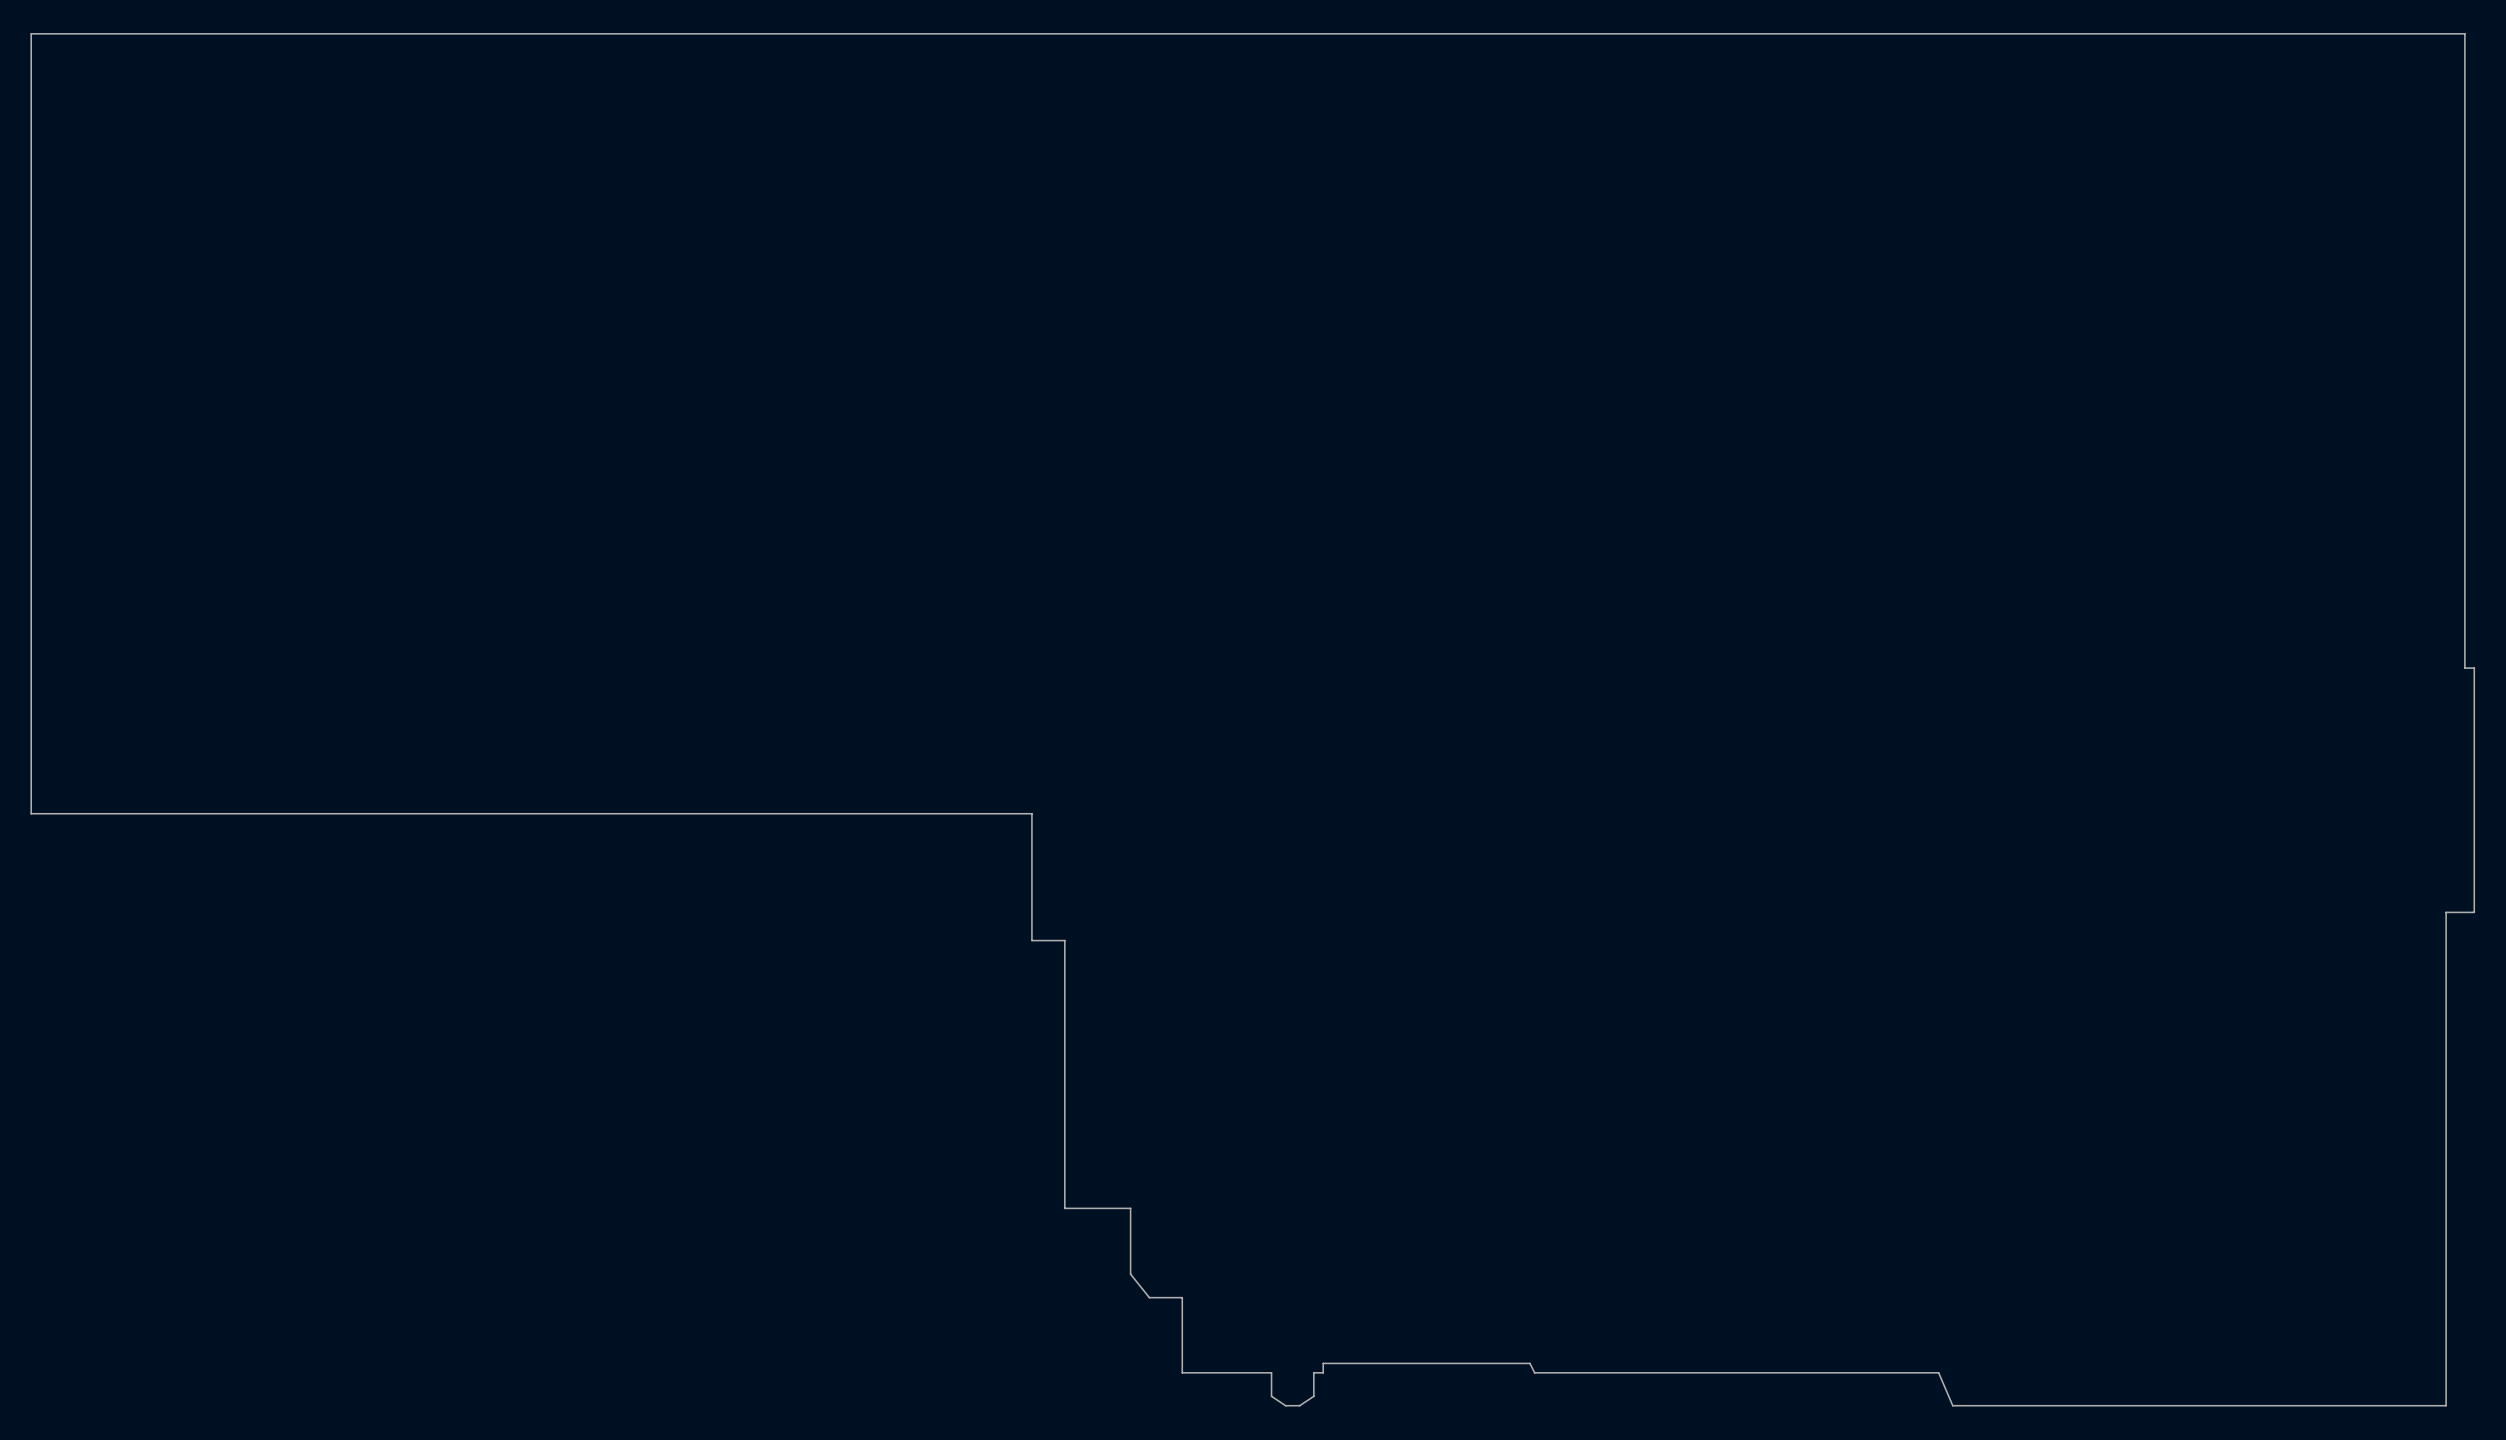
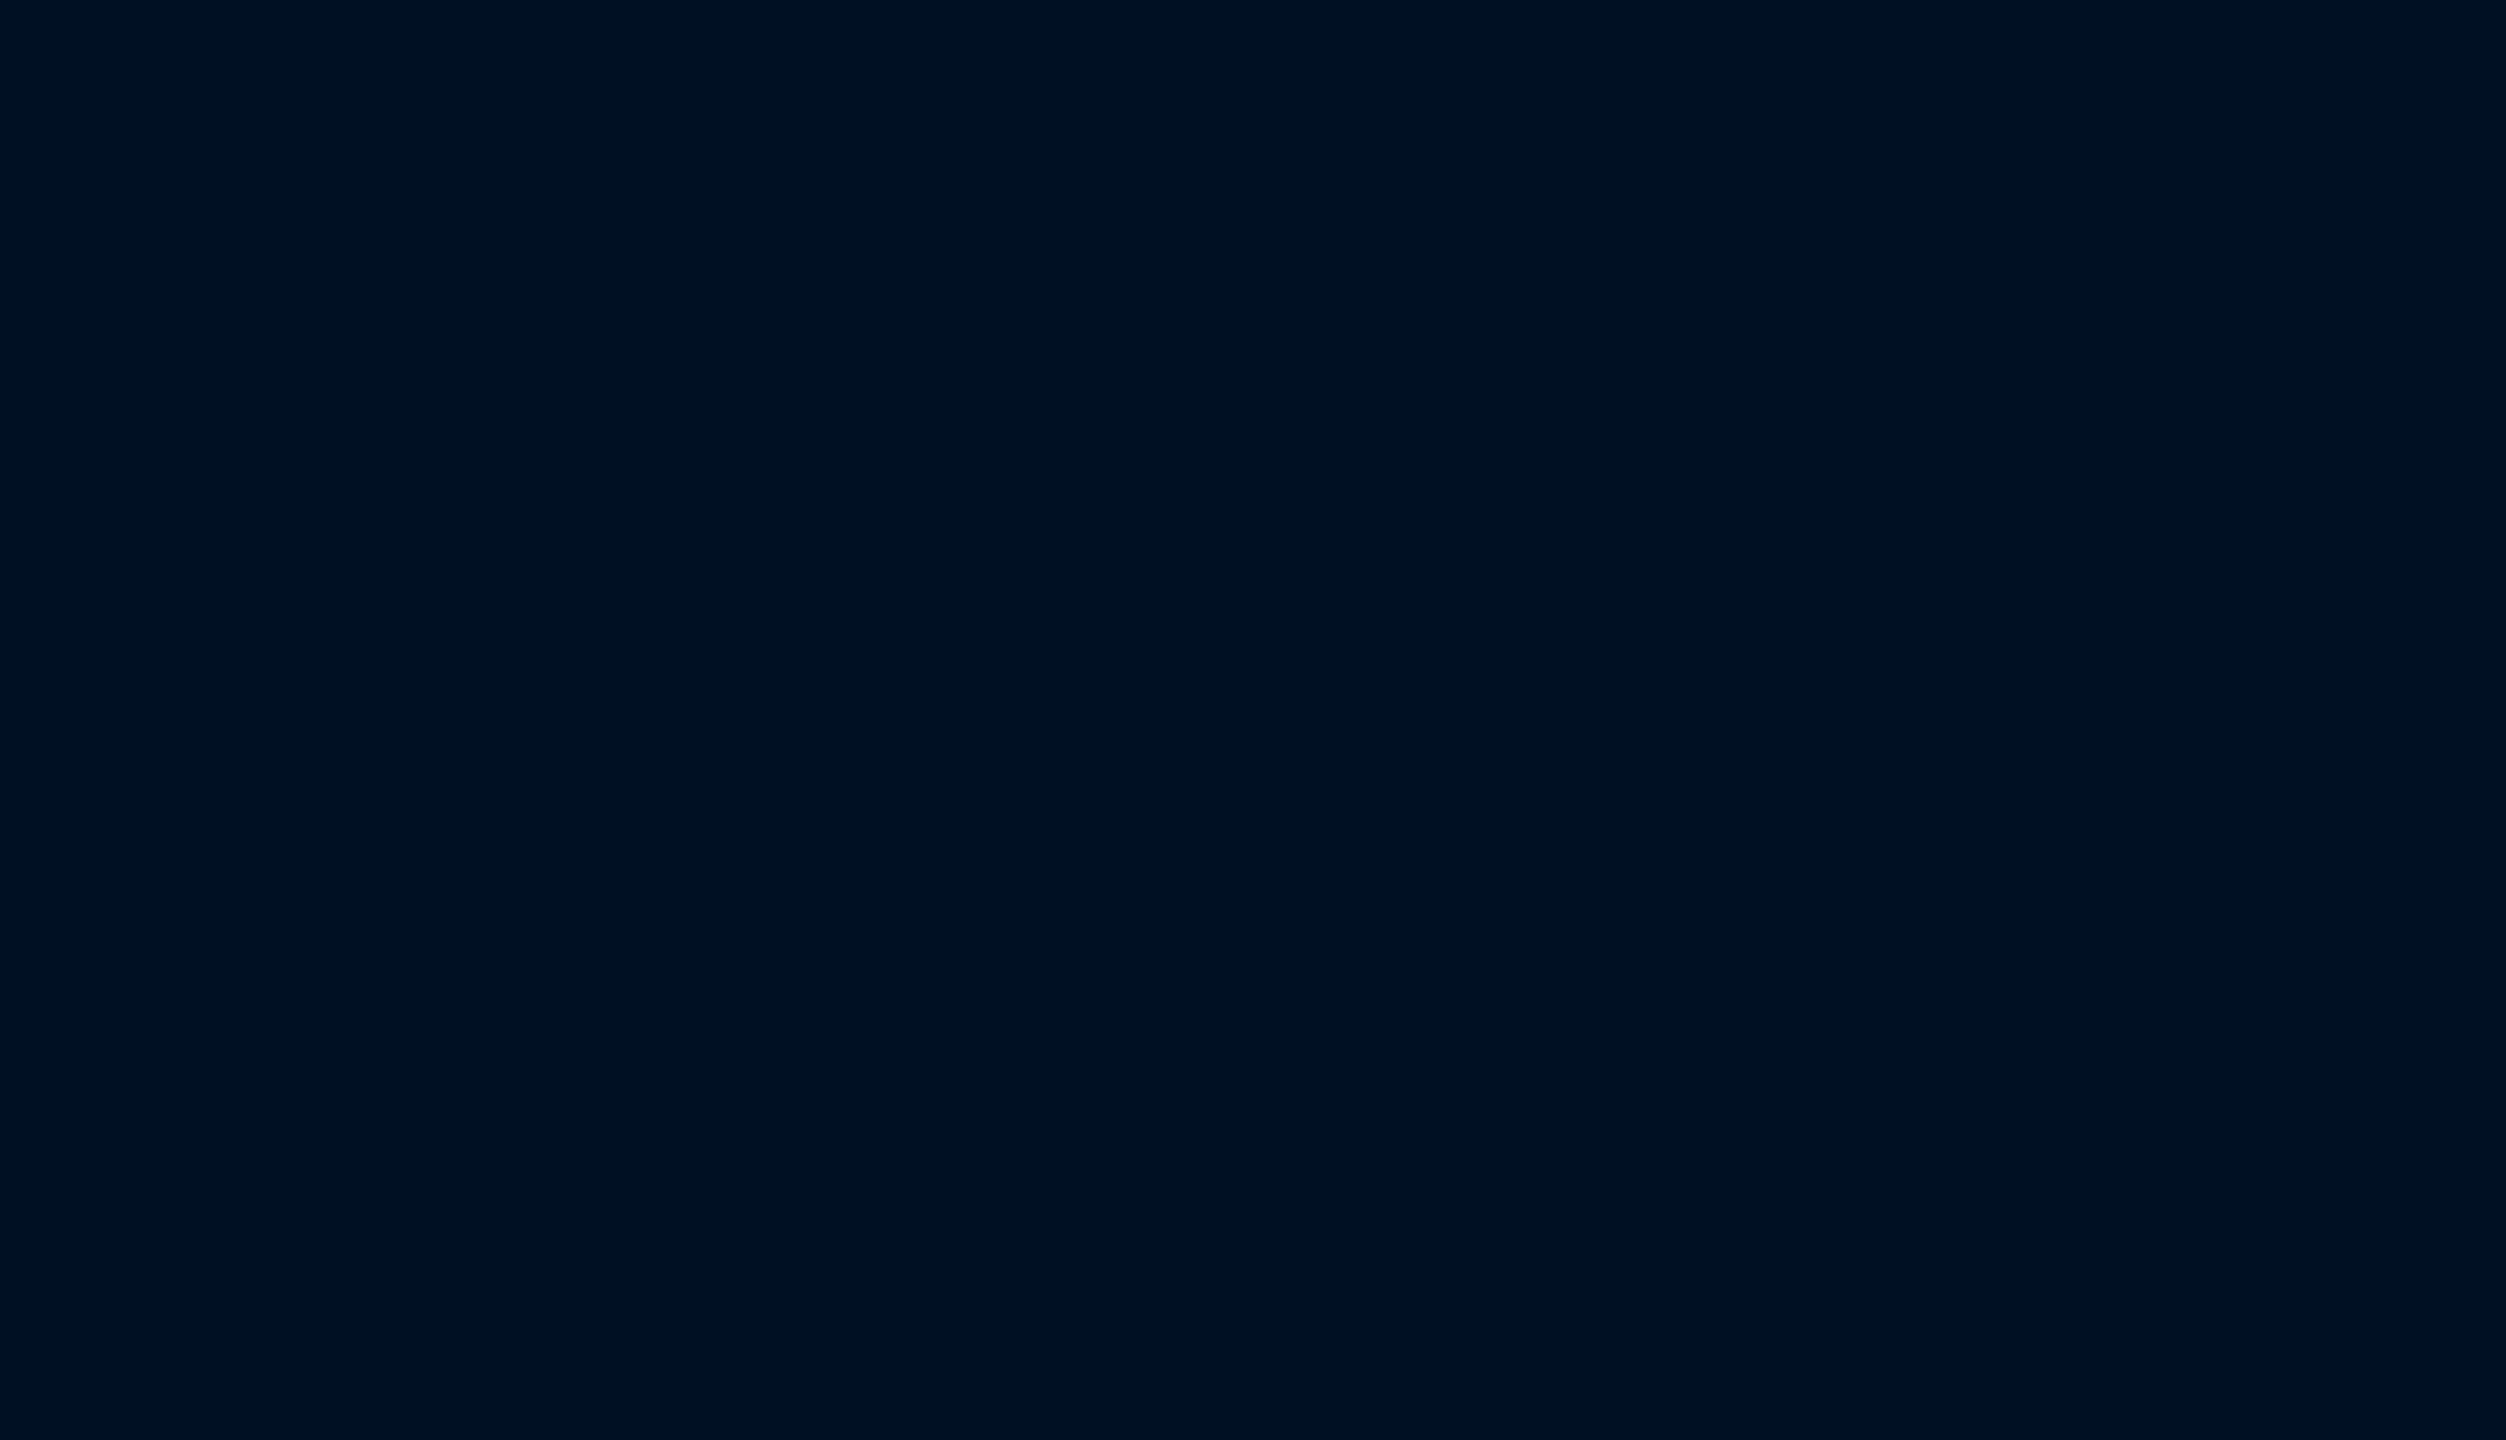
line: (31, 33) (31, 813) (1031, 813) (1031, 940) (1064, 940) (1064, 1208) (1130, 1208) (1130, 1274) (1149, 1297) (1182, 1297) (1182, 1372) (1271, 1372) (1271, 1396) (1285, 1405) (1299, 1405) (1313, 1396) (1313, 1372) (1323, 1372) (1323, 1363) (1529, 1363) (1534, 1372) (1938, 1372) (1952, 1405) (2446, 1405) (2446, 912) (2474, 912) (2474, 668) (2464, 668) (2464, 33) (31, 33) -> none

